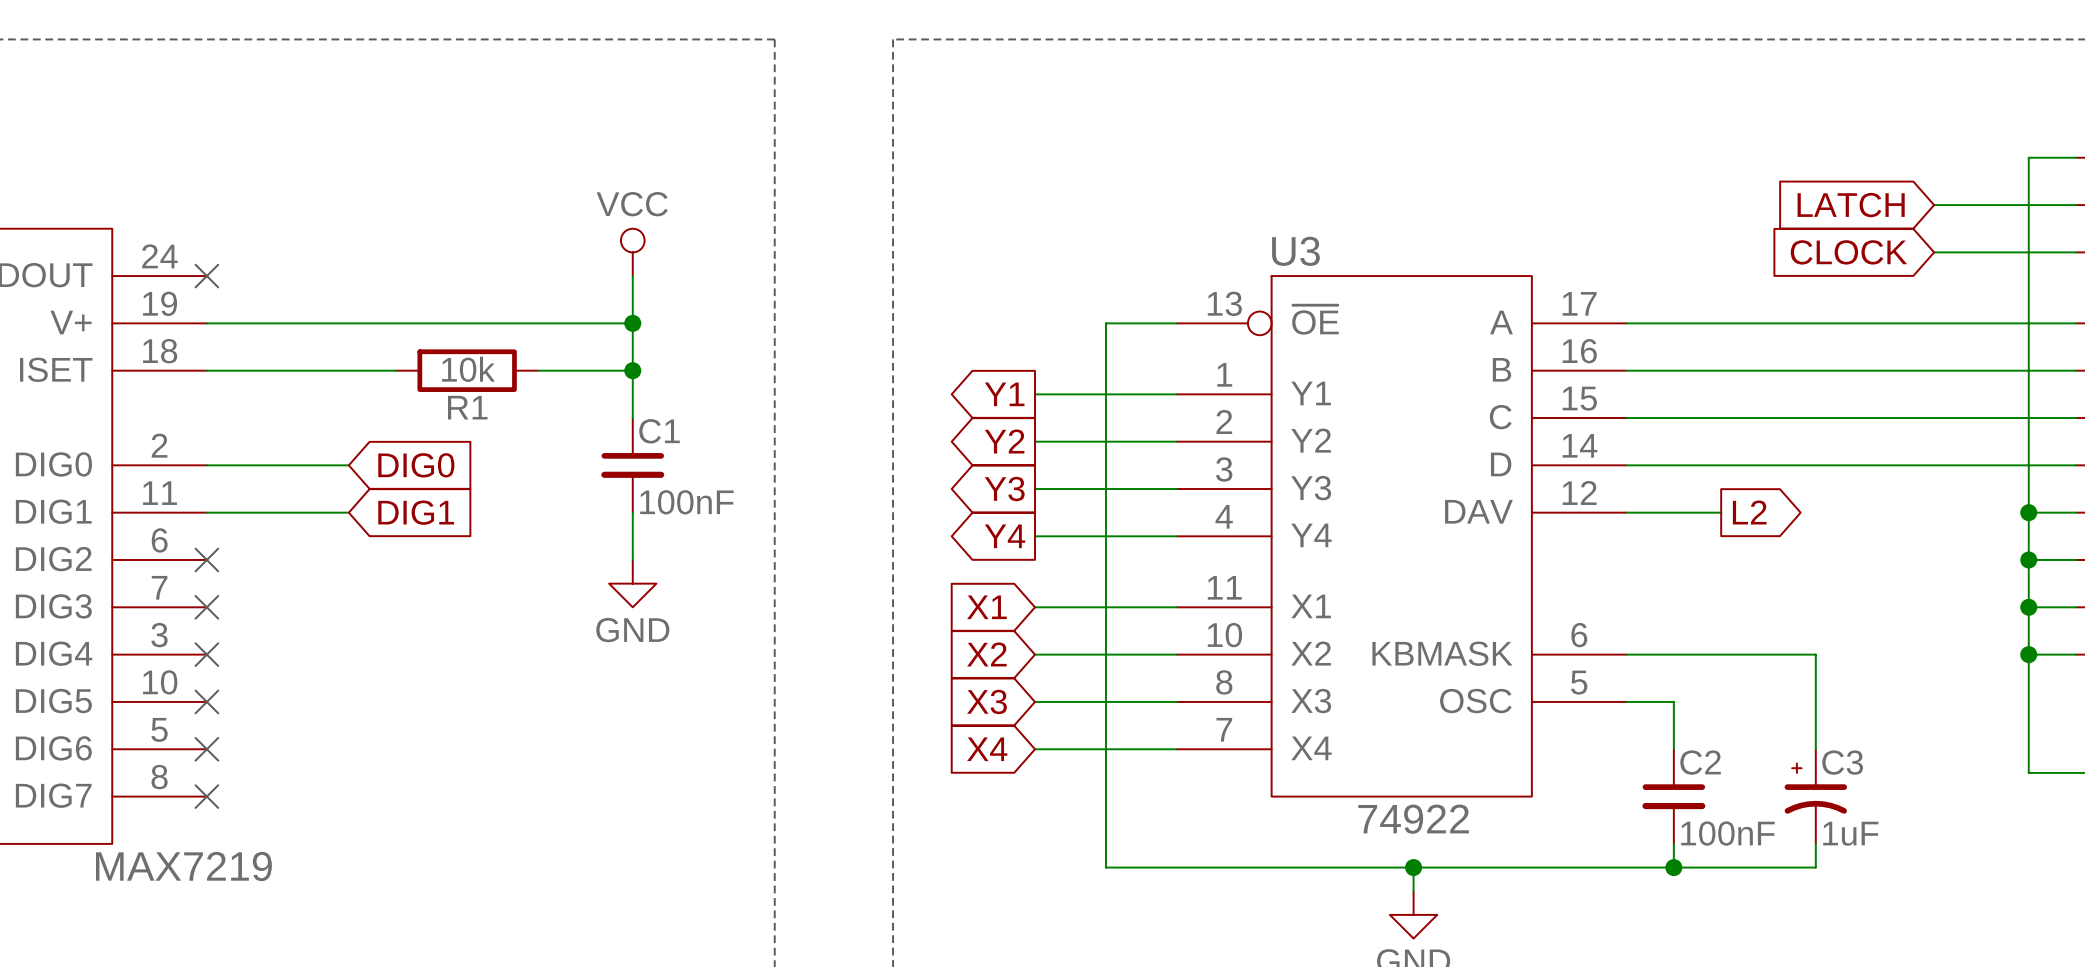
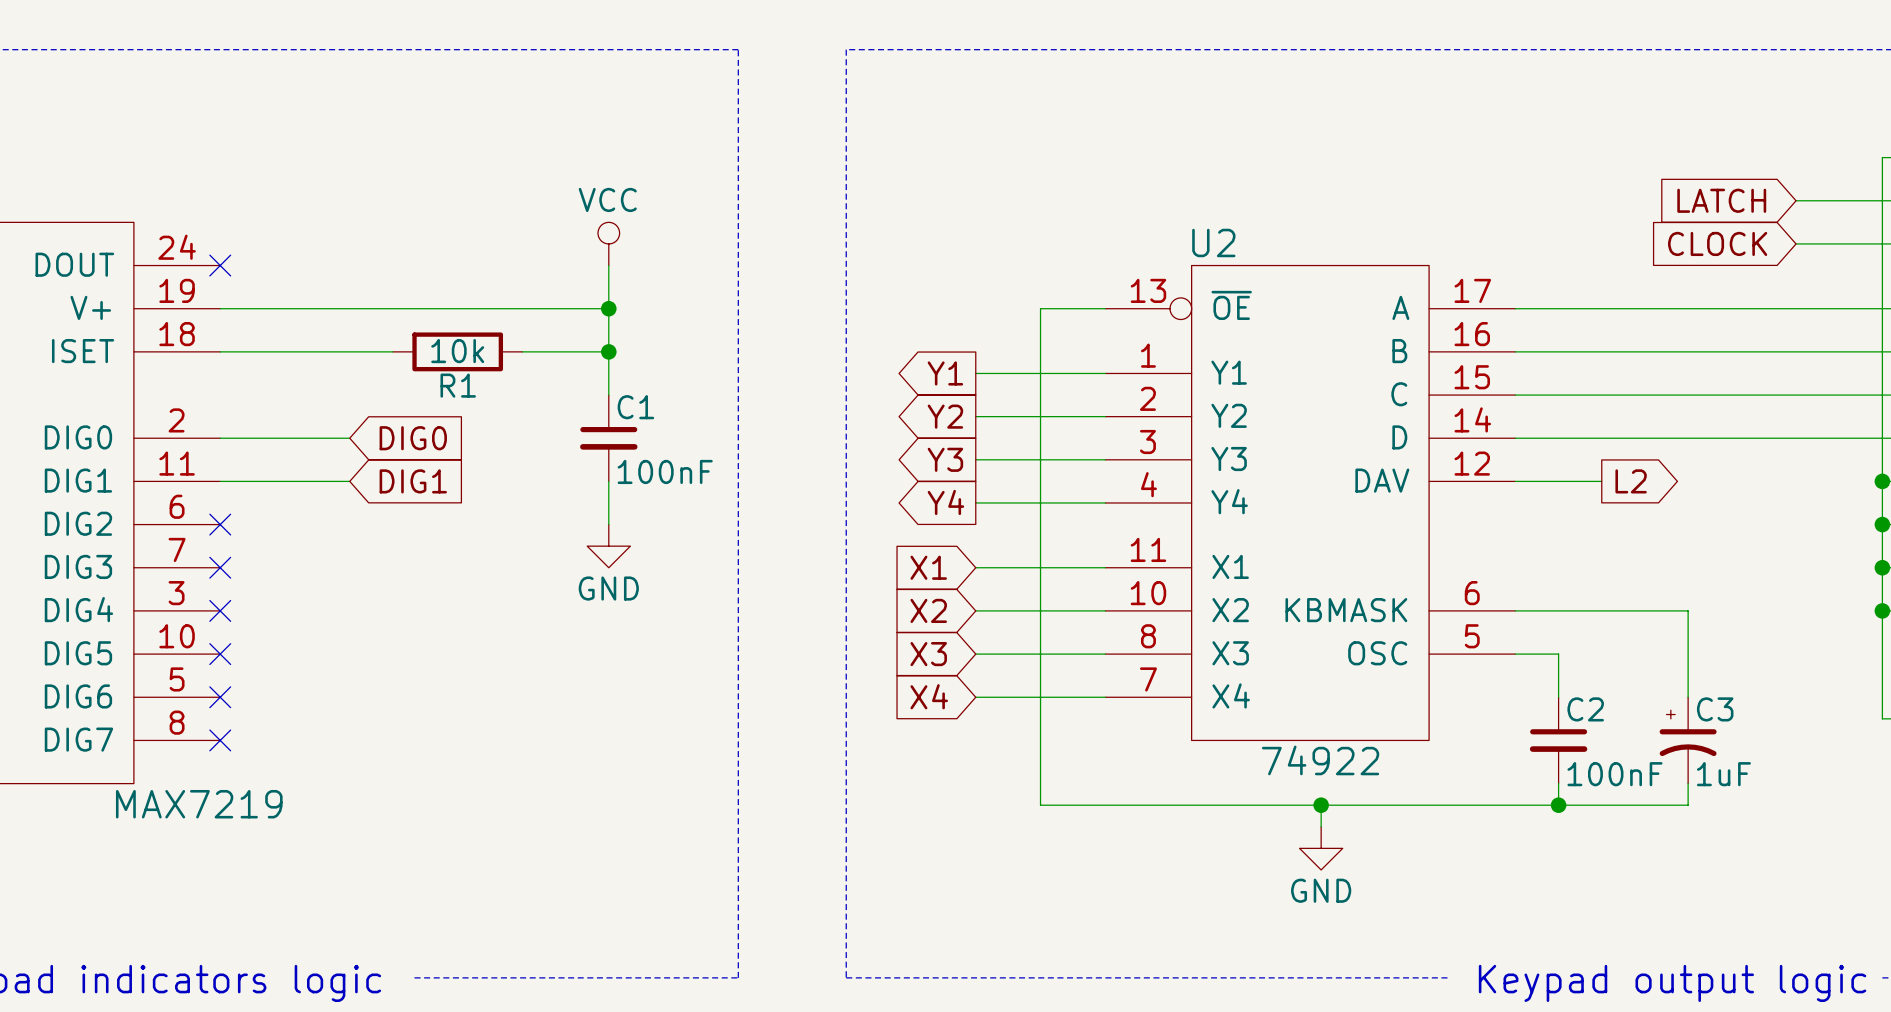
U3 name: U3 (1295, 251) -> U2 (1213, 242)

